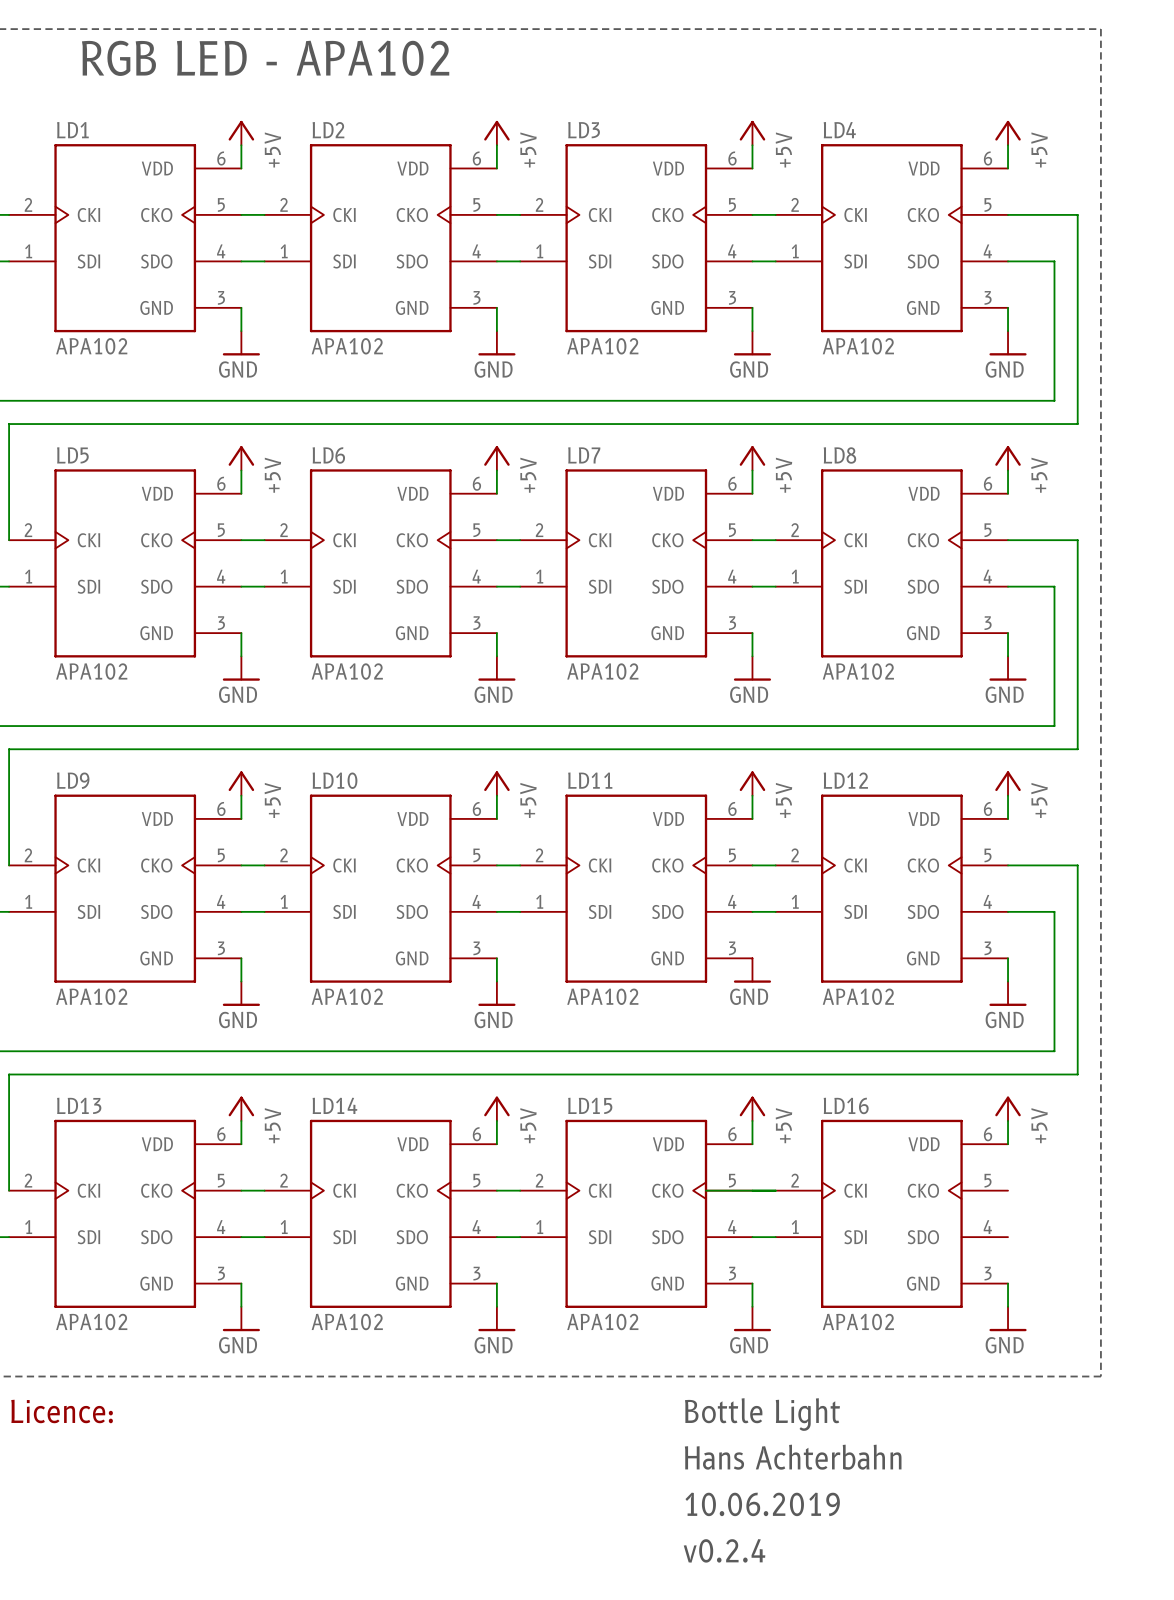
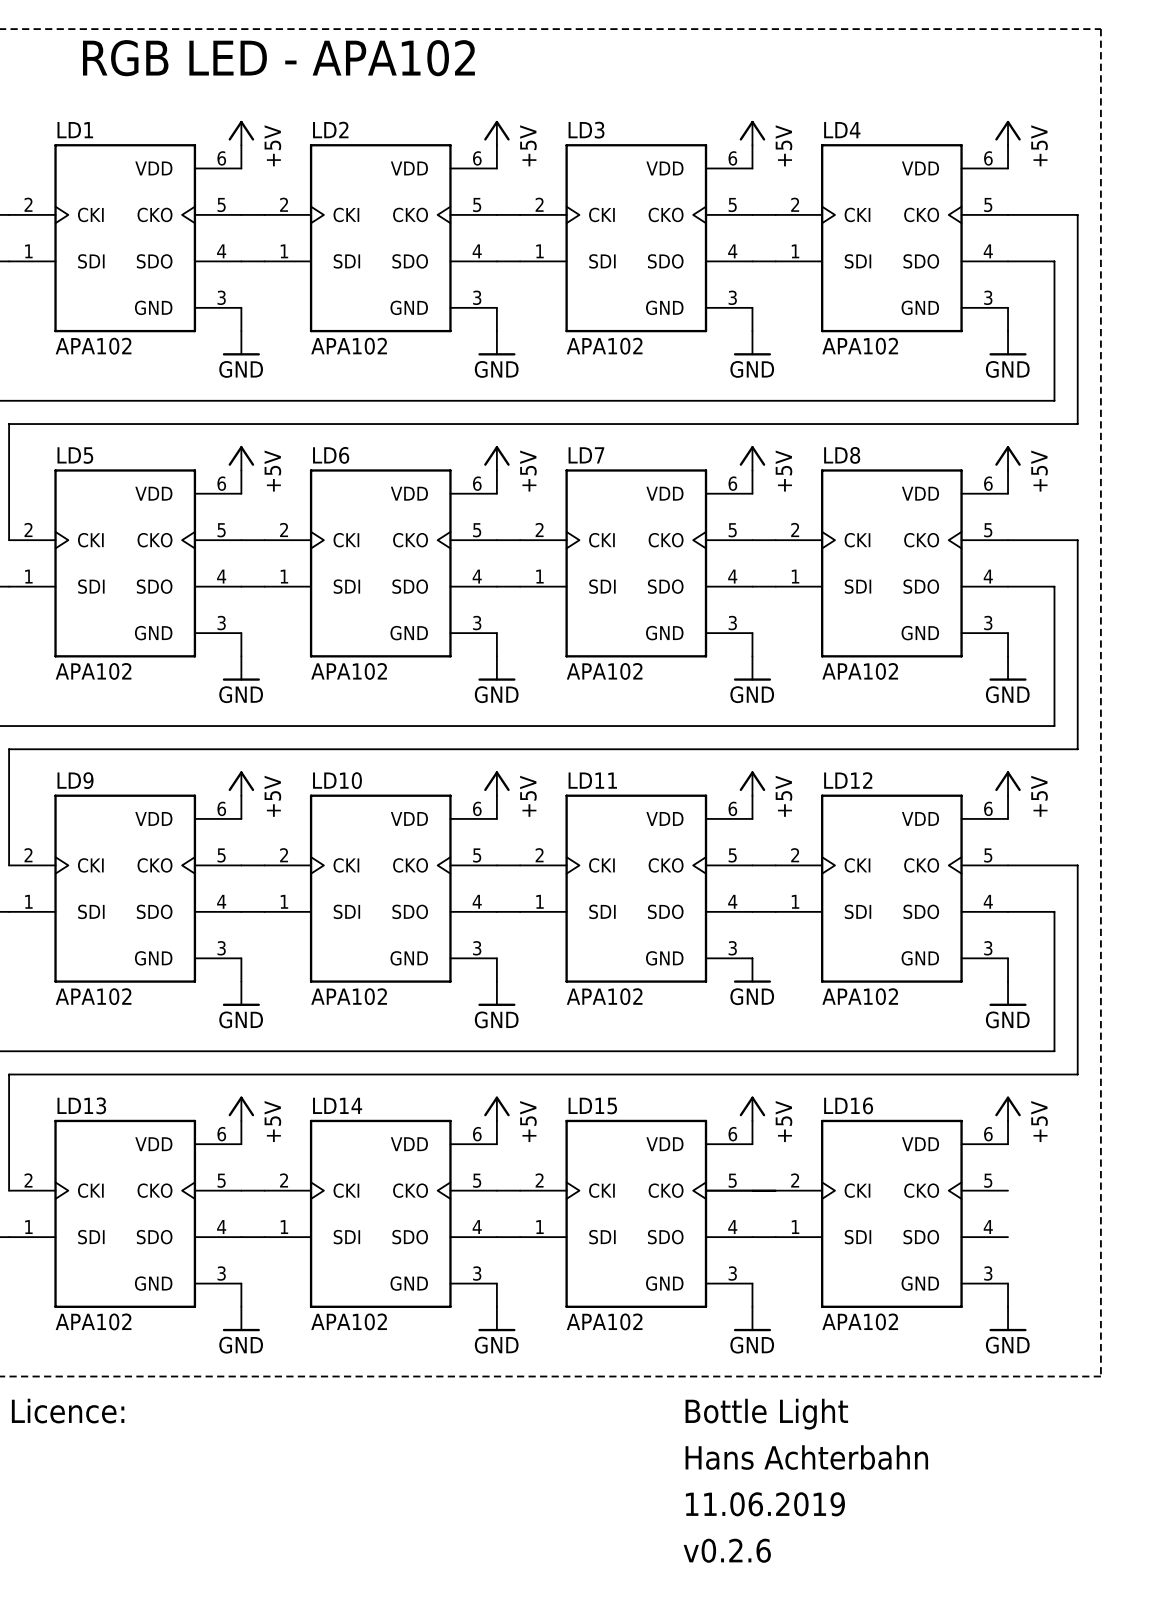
text: 10.06.2019 (762, 1504) -> 11.06.2019 (765, 1504)
text: v0.2.4 (724, 1550) -> v0.2.6 (727, 1550)

